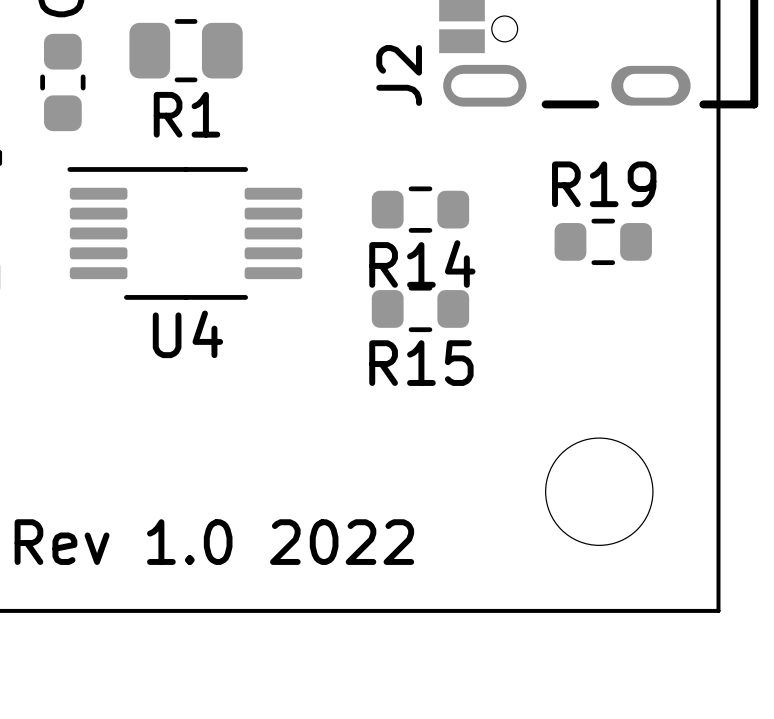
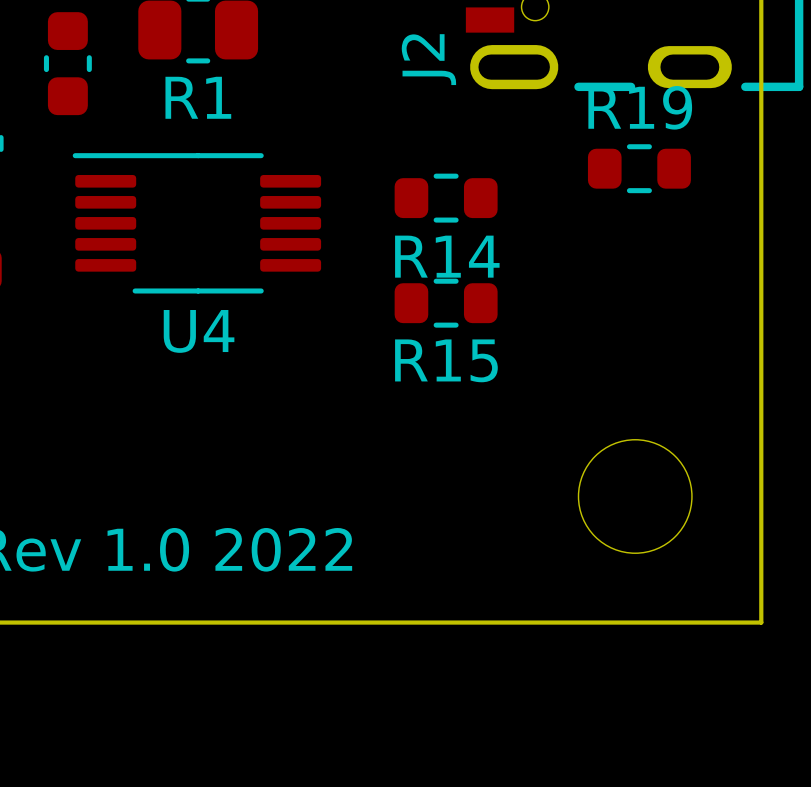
R19 position: (603, 241) -> (639, 168)

